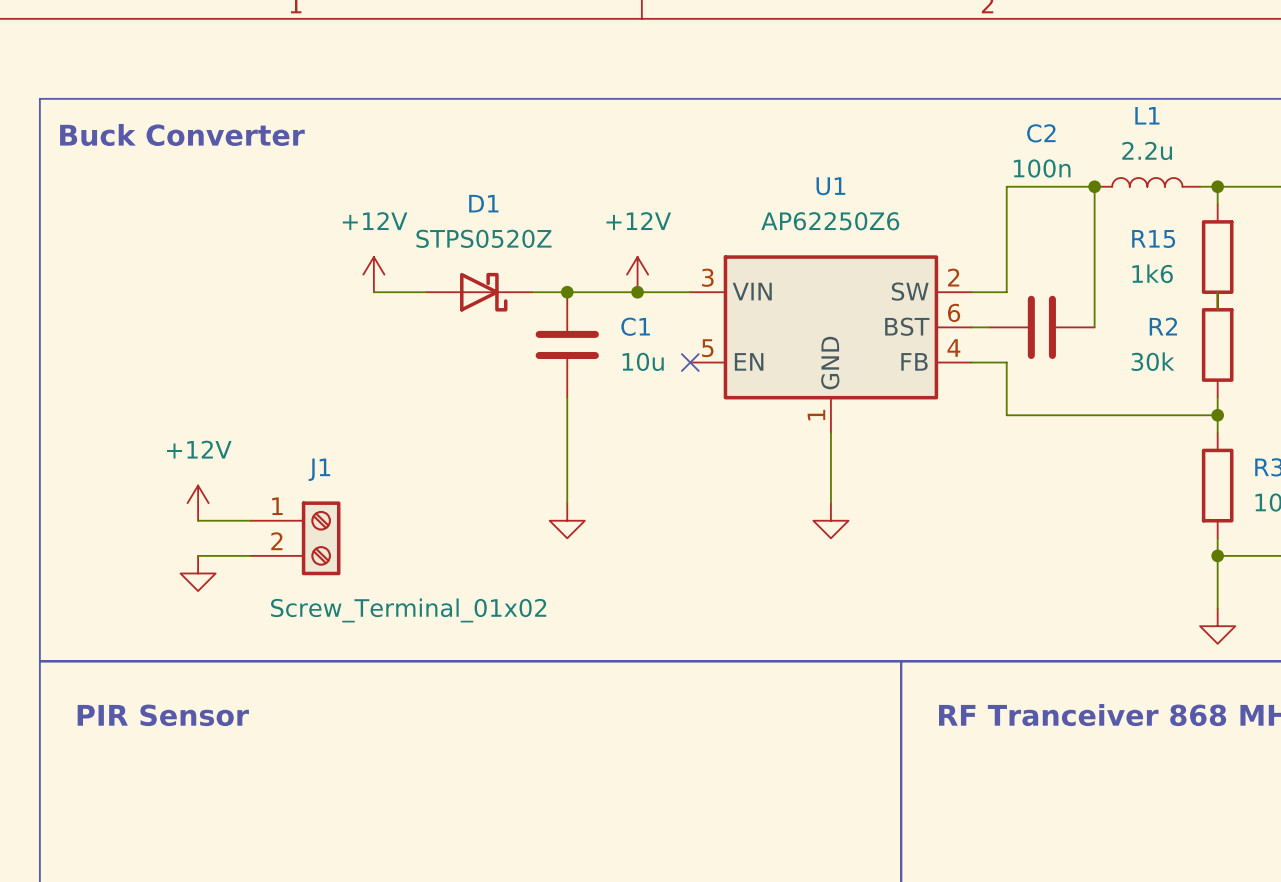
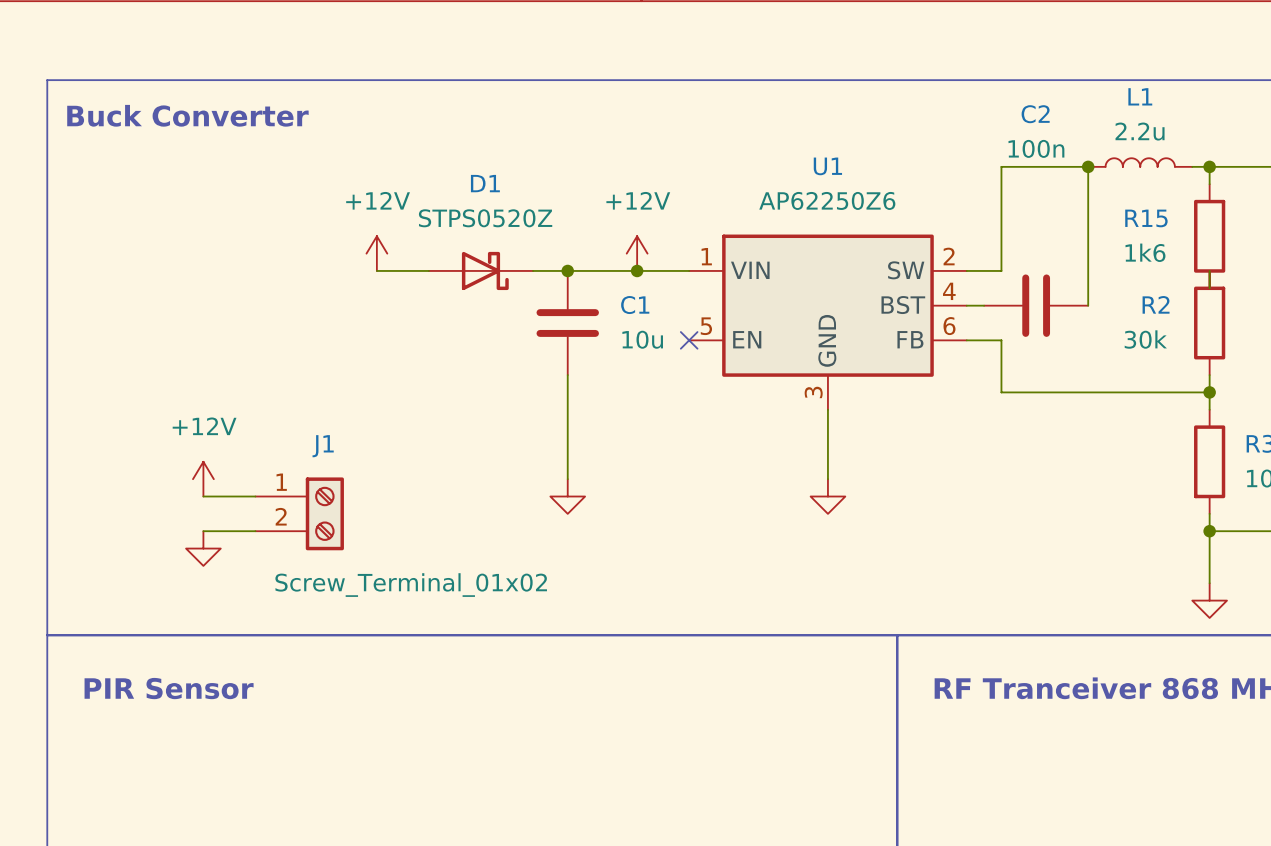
U1 pin number: 3 (707, 277) -> 1 (706, 256)
U1 pin number: 6 (954, 312) -> 4 (949, 291)
U1 pin number: 4 (953, 348) -> 6 (949, 326)
U1 pin number: 1 (816, 415) -> 3 (813, 392)

